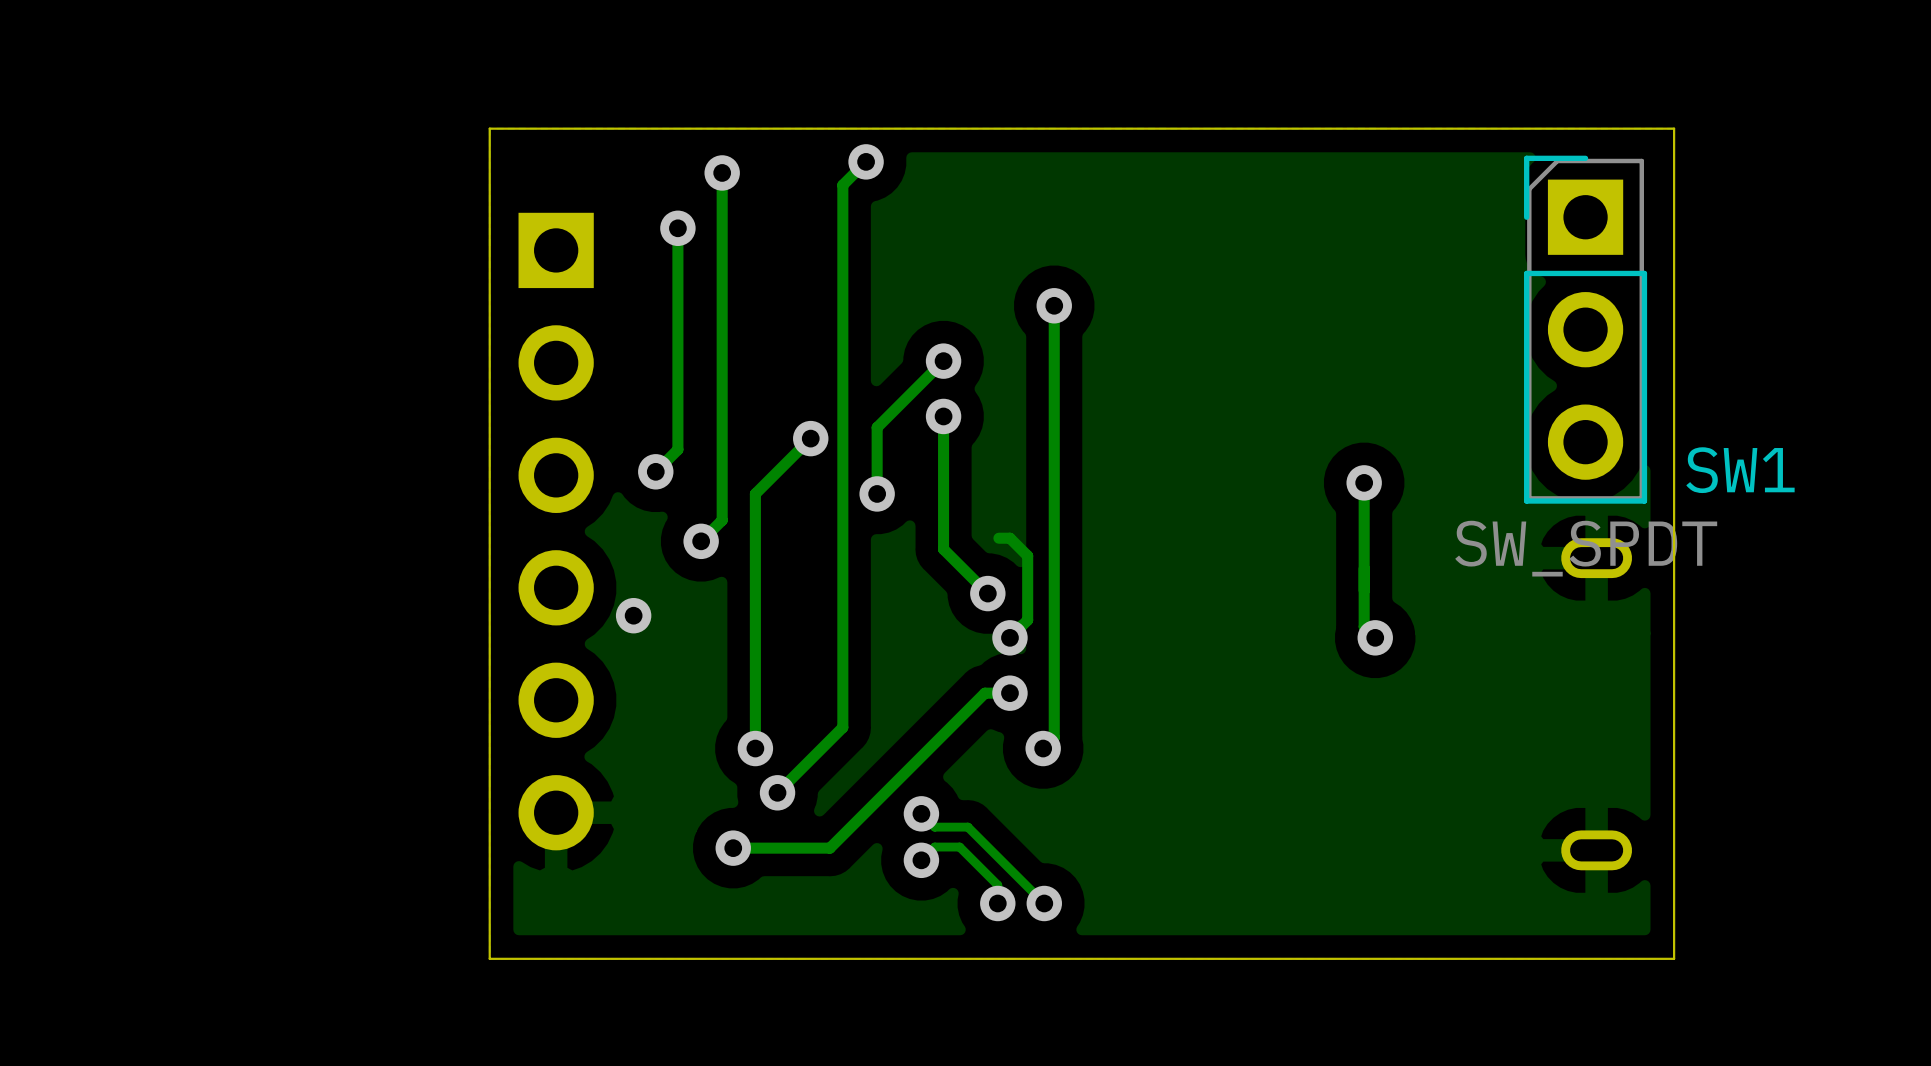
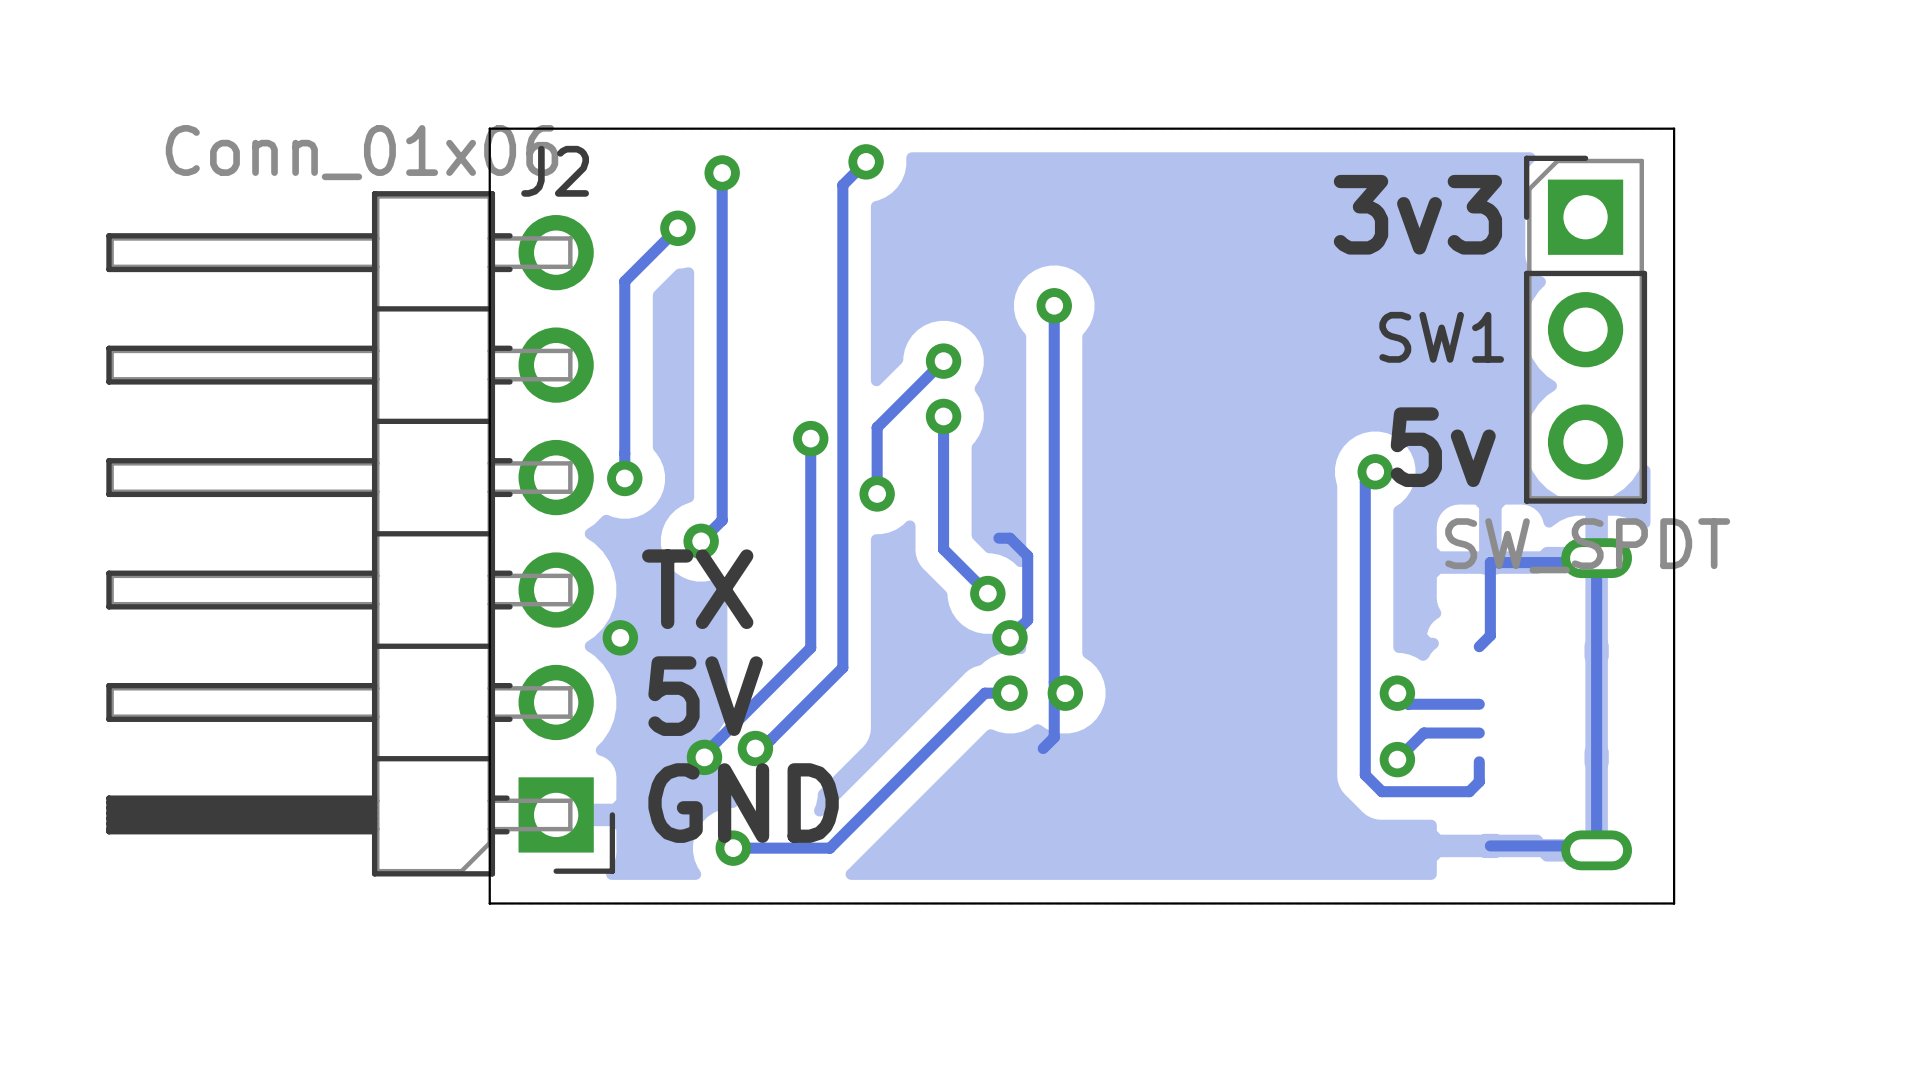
text: none -> 3v3 (1417, 214)
track: (677, 228) (677, 449) (655, 471) -> (677, 228) (624, 281) (624, 478)
track: (810, 438) (755, 493) (755, 748) -> (810, 438) (810, 647) (704, 754) (704, 757)
text: none -> 5v (1443, 447)
SW1 name position: SW1 (1740, 470) -> SW1 (1441, 337)
via position: (655, 471) -> (624, 478)
track: none -> (1375, 471) (1365, 481) (1365, 775) (1381, 791) (1469, 791) (1479, 781) (1479, 761)
track: (1364, 482) (1364, 626) (1375, 637) -> none
via position: (1364, 482) -> (1375, 471)
J2 side: top (556, 531) -> bottom (360, 533)
text: none -> TX (697, 589)
via position: (633, 615) -> (620, 637)
via position: (1375, 637) -> (1397, 693)
track: none -> (1479, 646) (1490, 635) (1490, 562) (1592, 562) (1596, 558) (1596, 850) (1592, 845) (1490, 845)
track: (842, 667) (842, 727) (777, 792) -> (842, 667) (753, 757)
track: none -> (1397, 693) (1408, 704) (1479, 704)
text: none -> 5V (705, 696)
track: none -> (1479, 733) (1423, 733) (1397, 759)
via position: (1043, 748) -> (1065, 693)
via: none -> (704, 757)
via: none -> (1397, 759)
via: (777, 792) -> none
text: none -> GND (743, 803)
track: (921, 813) (934, 827) (967, 827) (1044, 903) -> none
via: (921, 813) -> none
track: (921, 860) (934, 847) (959, 847) (997, 885) (997, 903) -> none
via: (921, 860) -> none
via: (997, 903) -> none
via: (1044, 903) -> none
board edge: (1674, 903) (1674, 958) (489, 958) (489, 903) -> (1674, 903) (489, 903)

